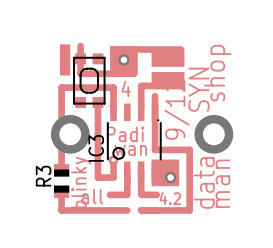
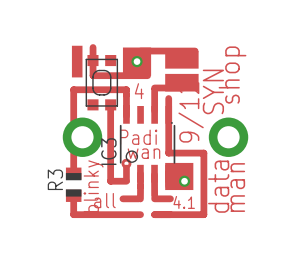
text: 4.2 (170, 198) -> 4.1 (184, 202)

